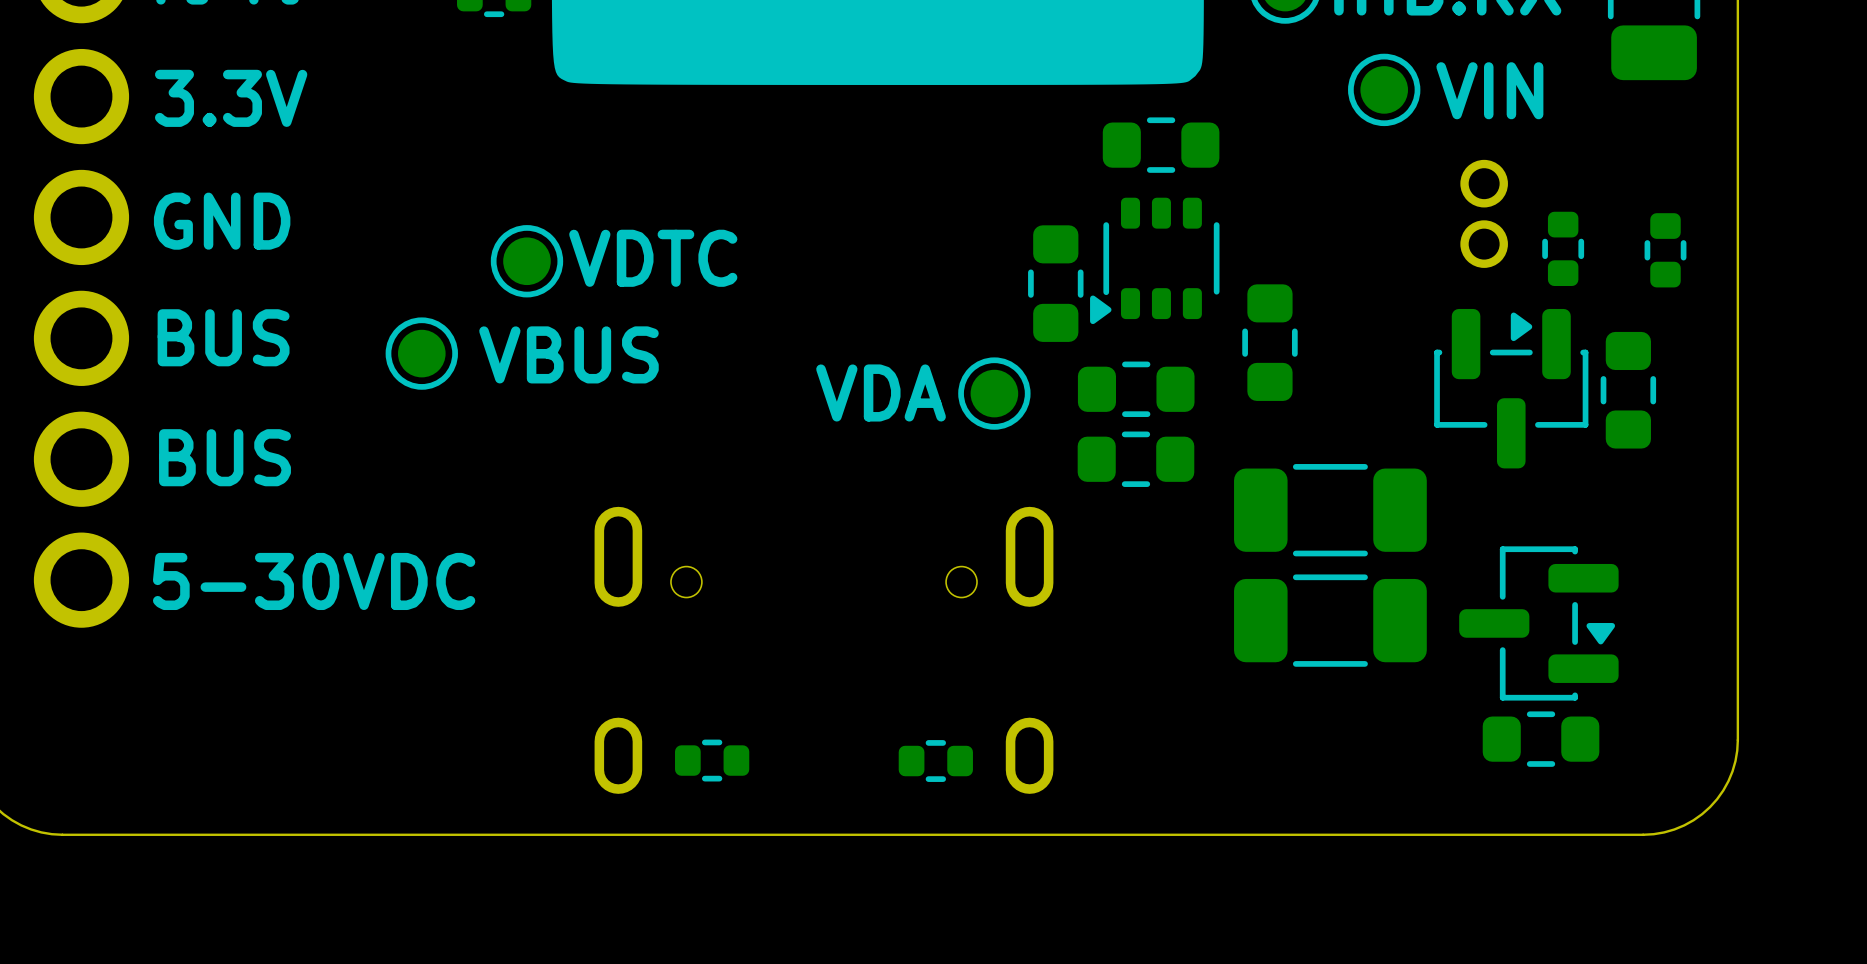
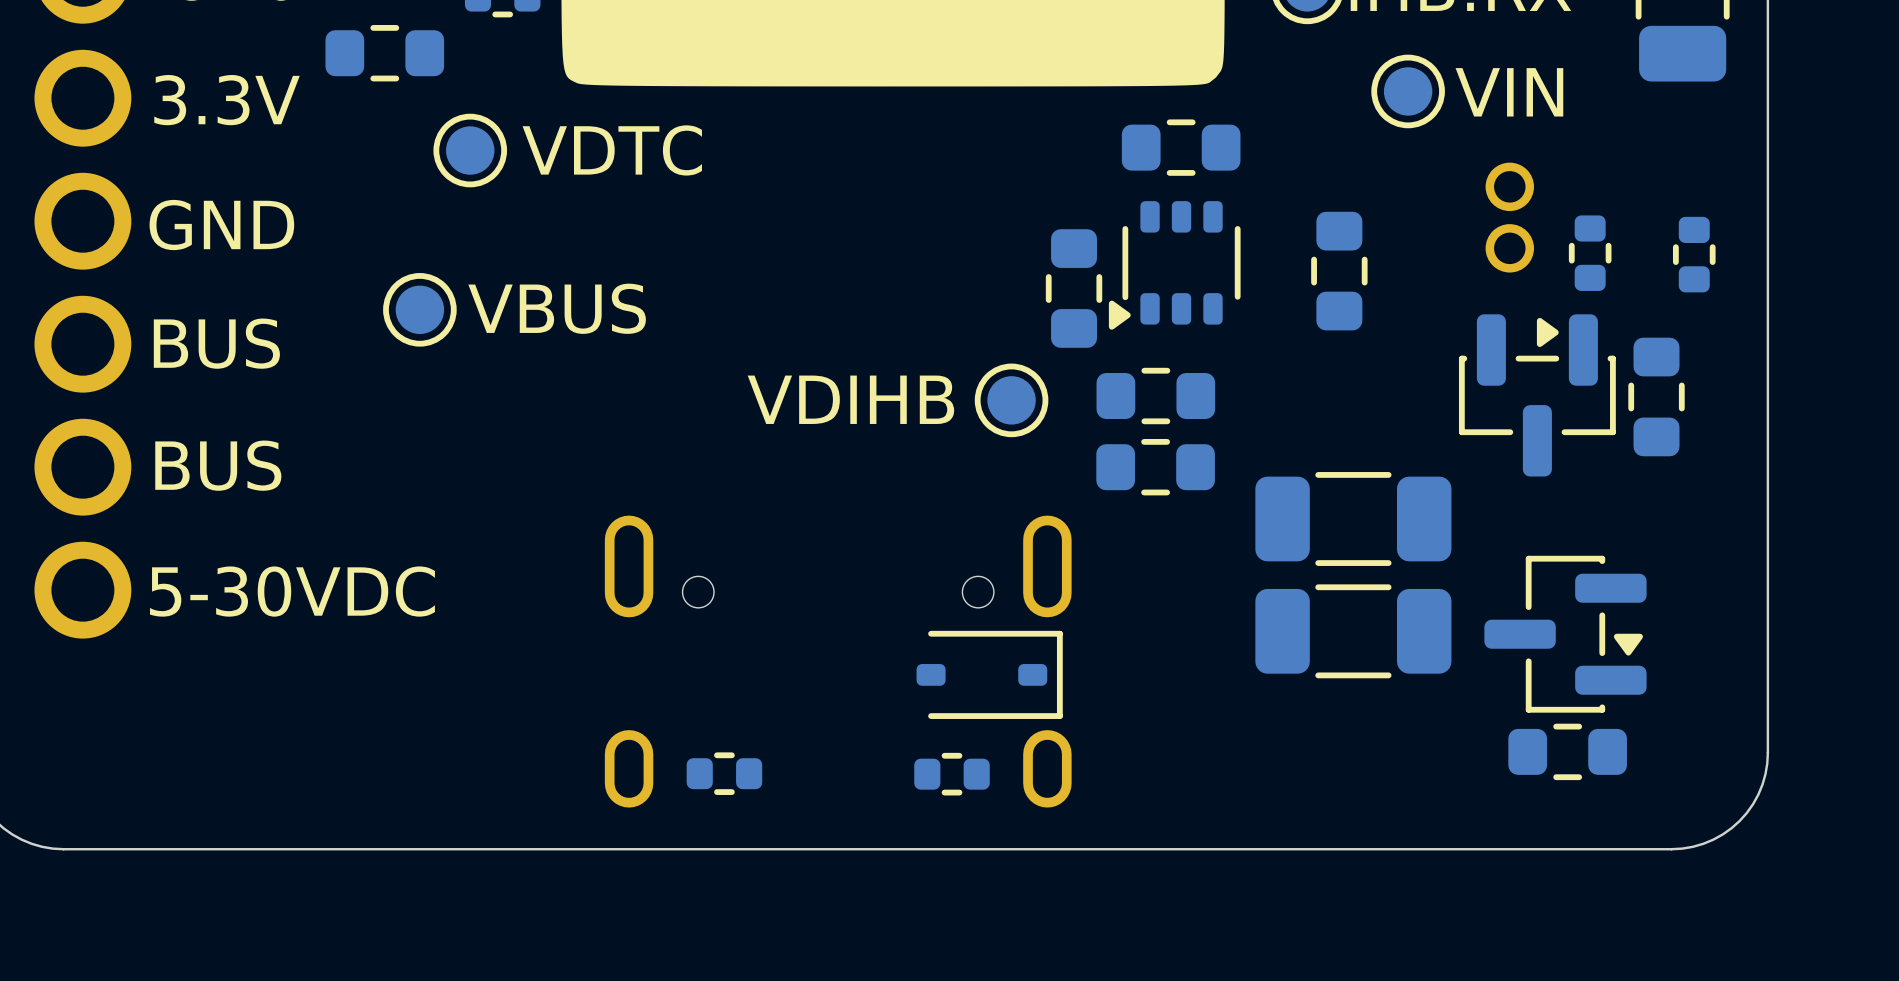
part: none -> (384, 53)
part: none -> (470, 150)
text position: VDTC (653, 258) -> VDTC (612, 150)
part: (526, 261) -> none
part position: (1269, 342) -> (1339, 271)
part position: (421, 353) -> (419, 309)
text position: VBUS (568, 354) -> VBUS (557, 308)
text: none -> VDIHB (850, 399)
text: VDA (881, 392) -> none
part: none -> (989, 674)

